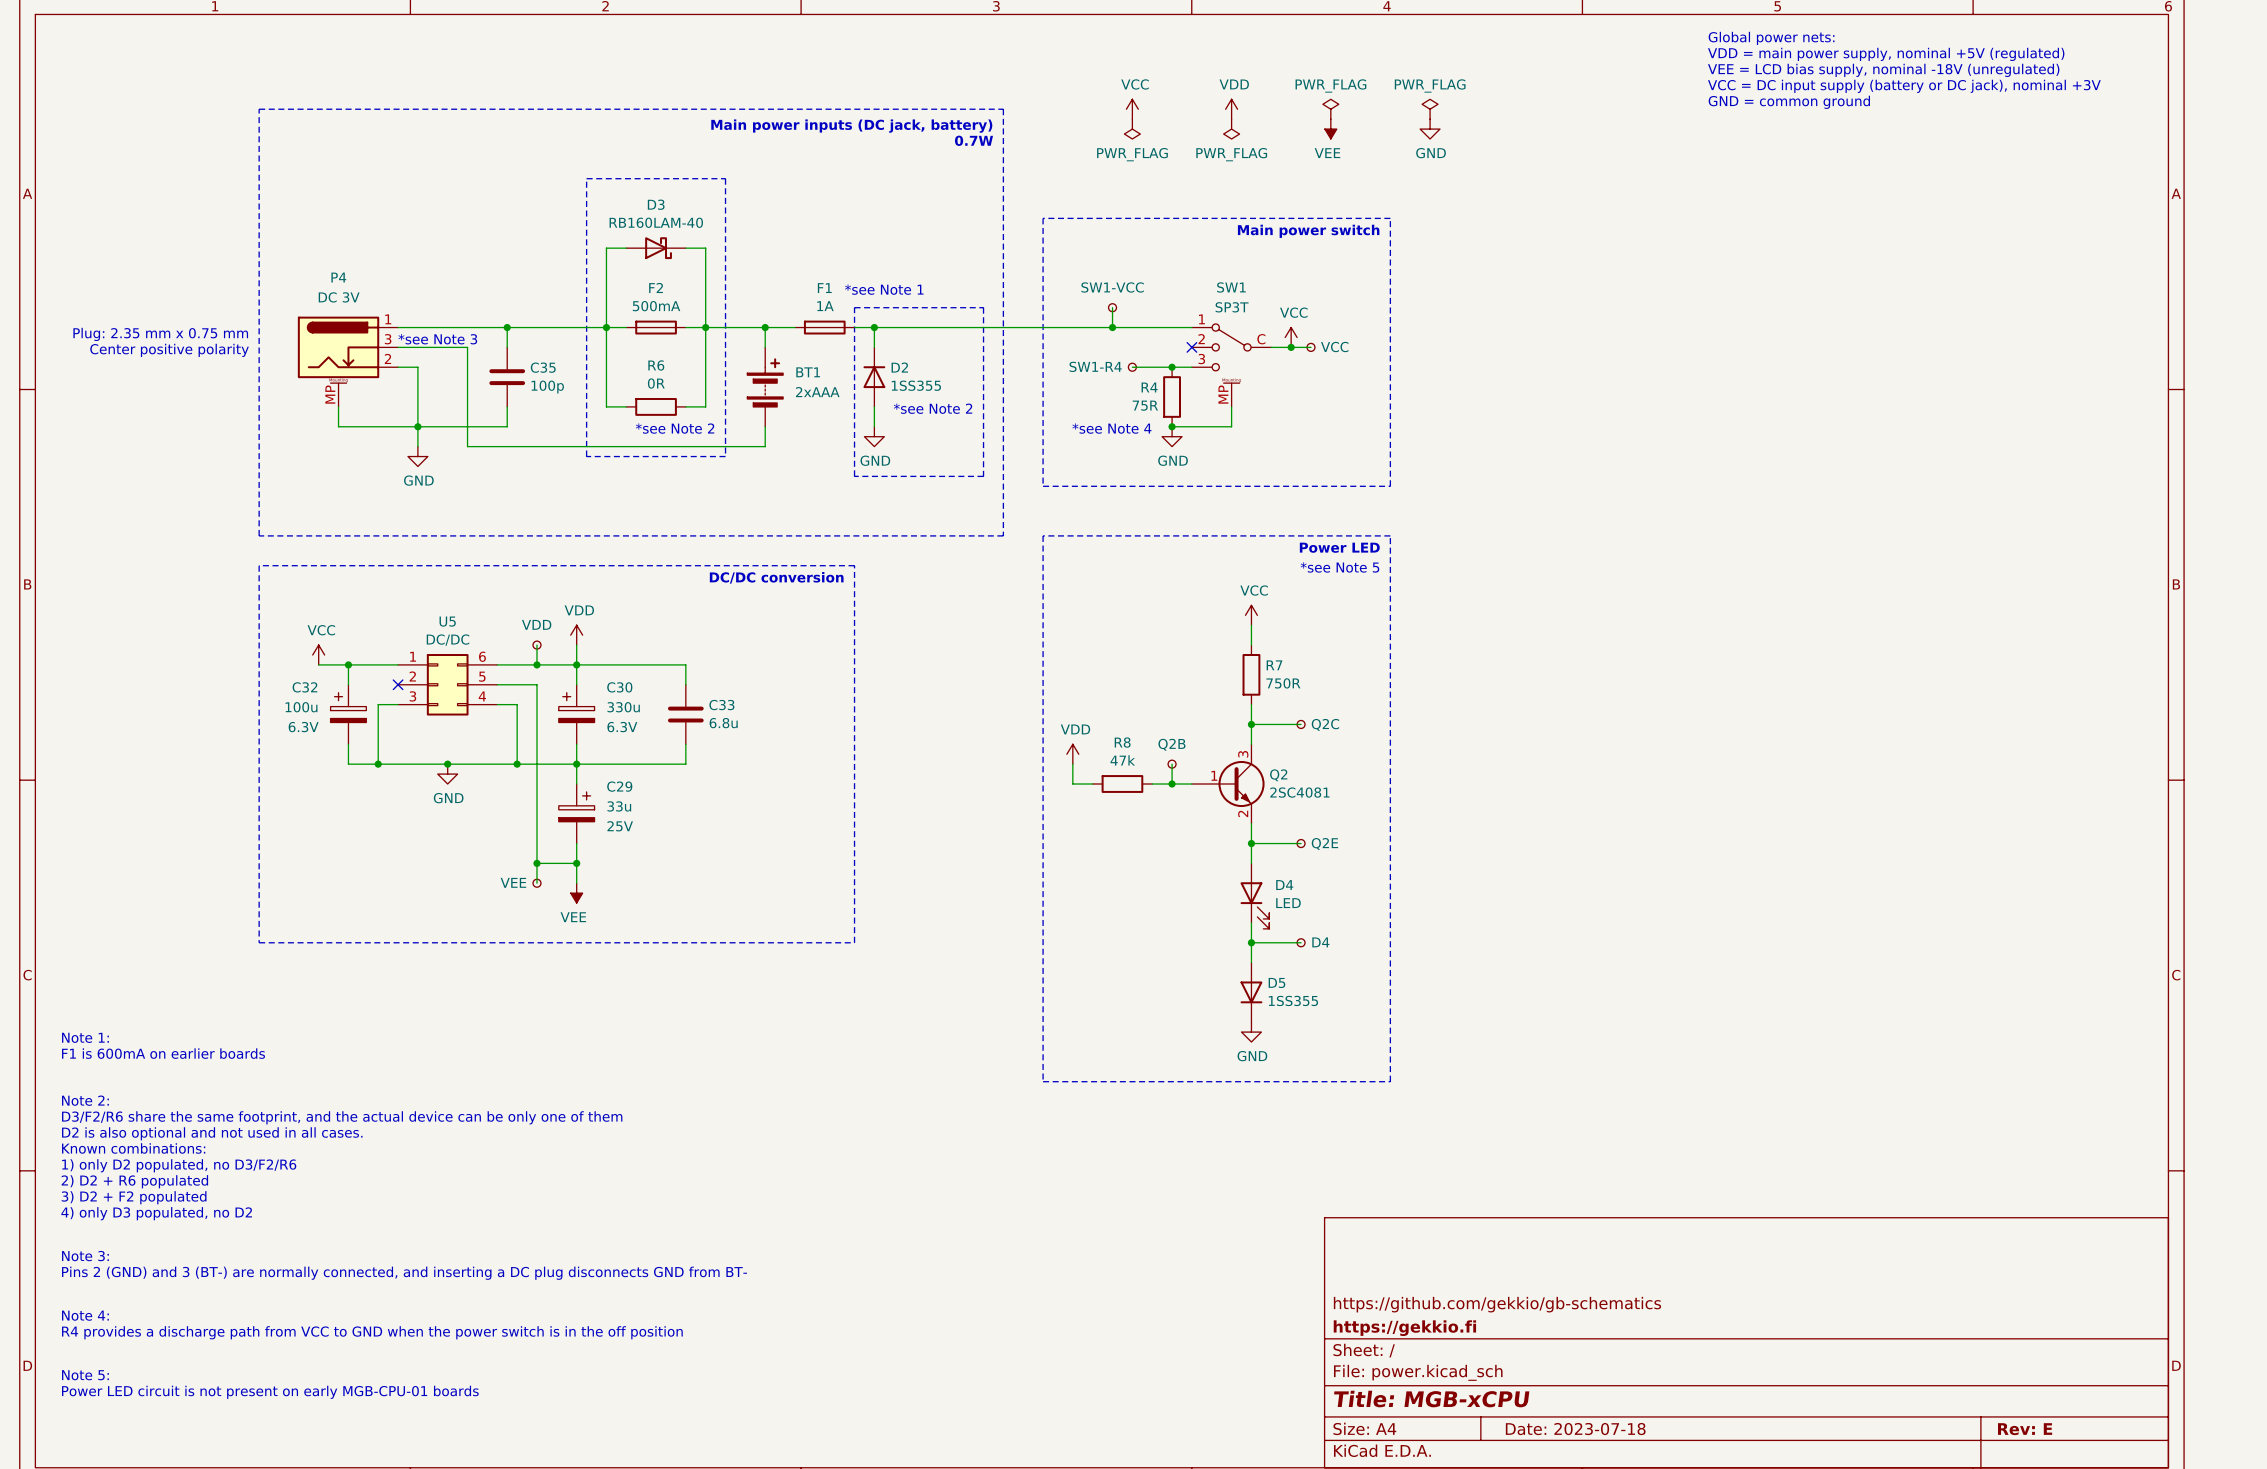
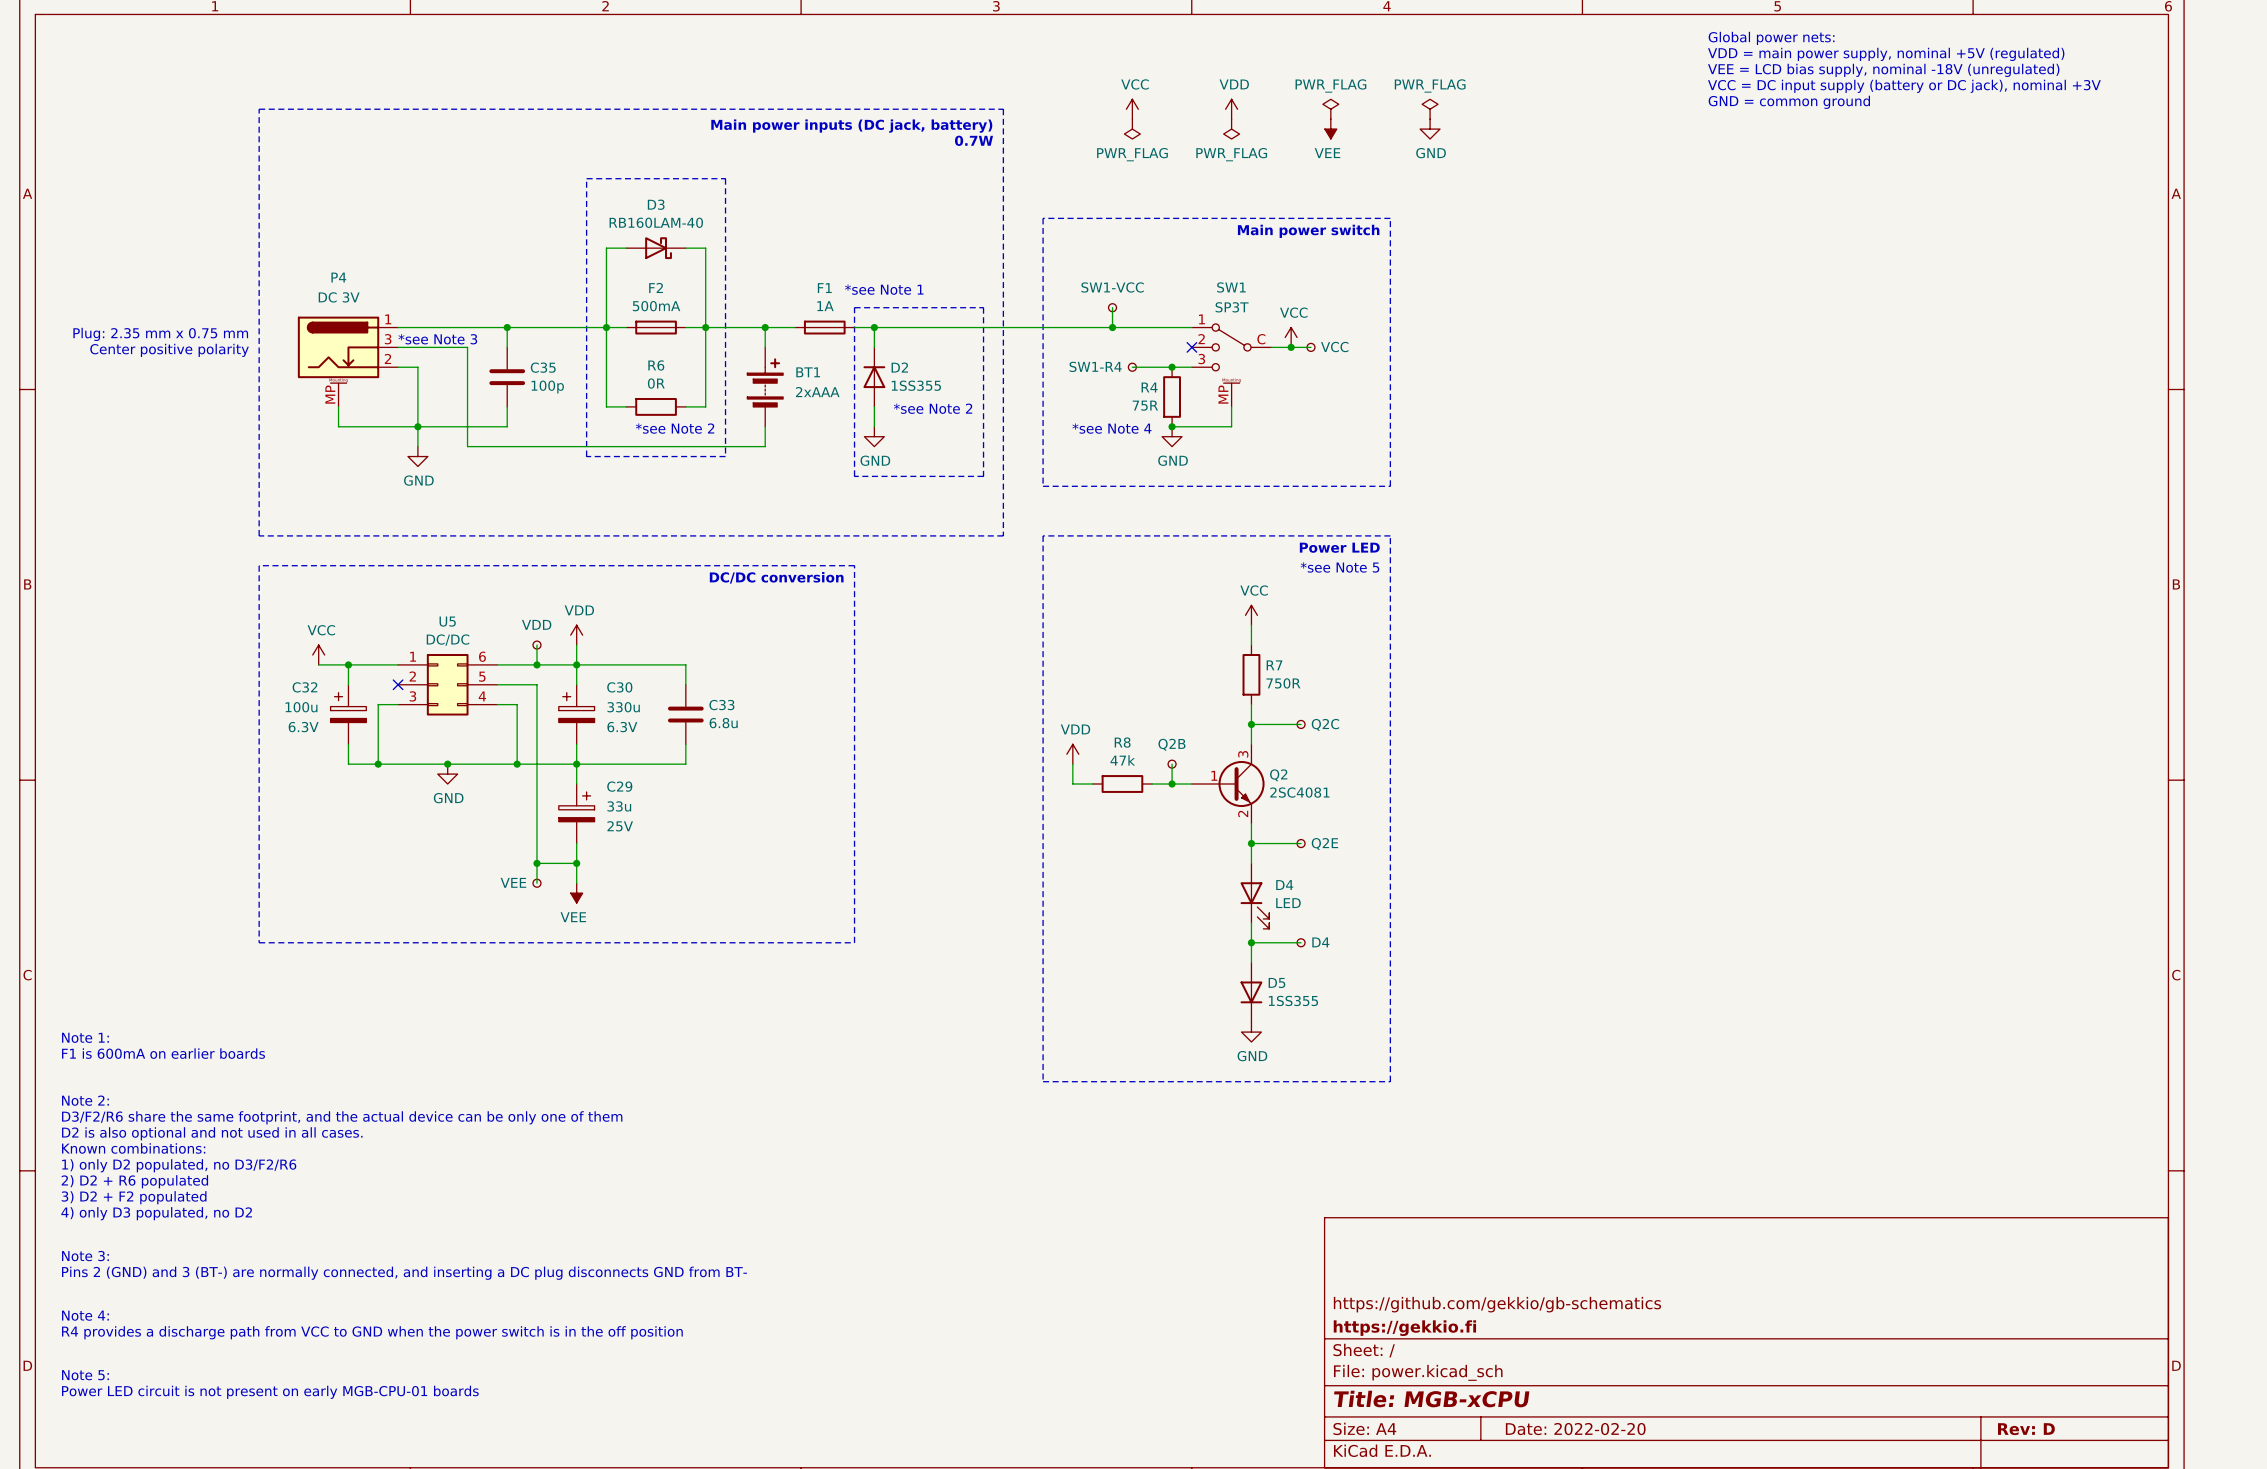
title block: Date: 2023-07-18 (1575, 1429) -> Date: 2022-02-20 (1575, 1429)
title block: Rev: E (2025, 1429) -> Rev: D (2026, 1429)

